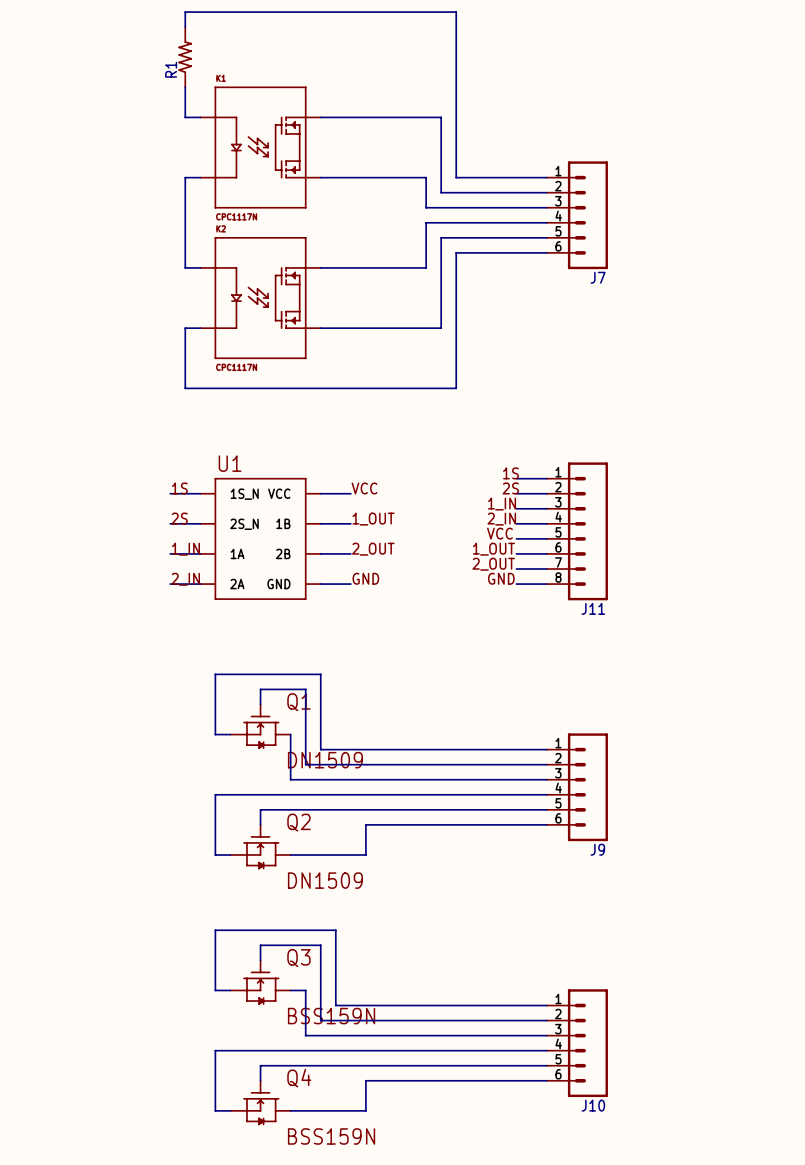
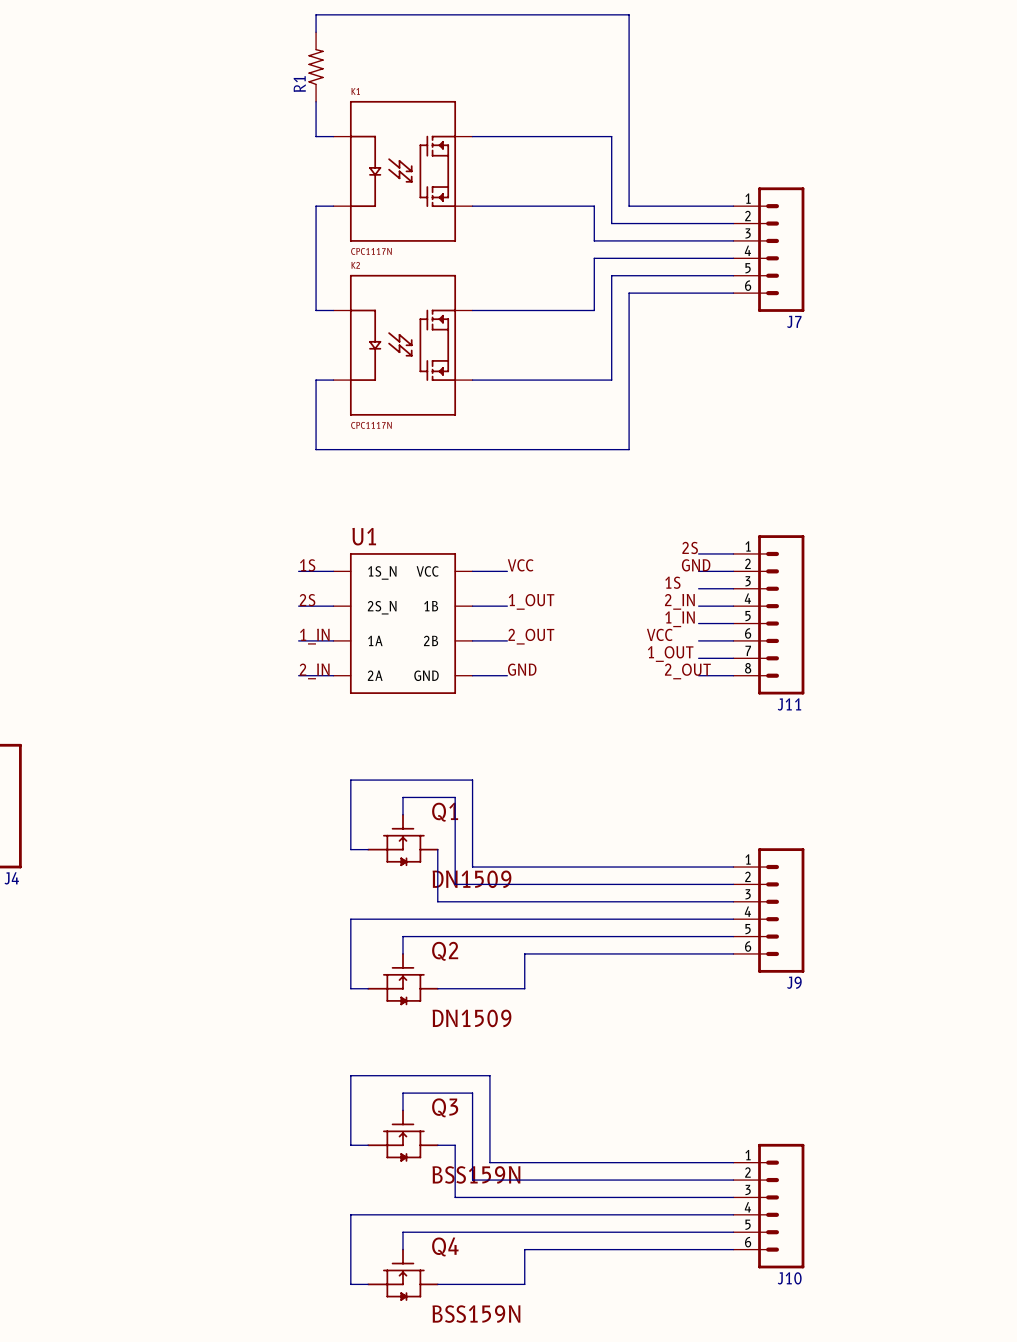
label: 1S (510, 473) -> 2S (690, 547)
label: 2S (510, 488) -> GND (696, 565)
label: 1_IN (502, 504) -> 1S (672, 582)
label: VCC (499, 533) -> 1_IN (680, 619)
label: 1_OUT (493, 549) -> VCC (659, 634)
label: 2_OUT (493, 564) -> 1_OUT (670, 654)
label: GND (501, 578) -> 2_OUT (687, 671)

